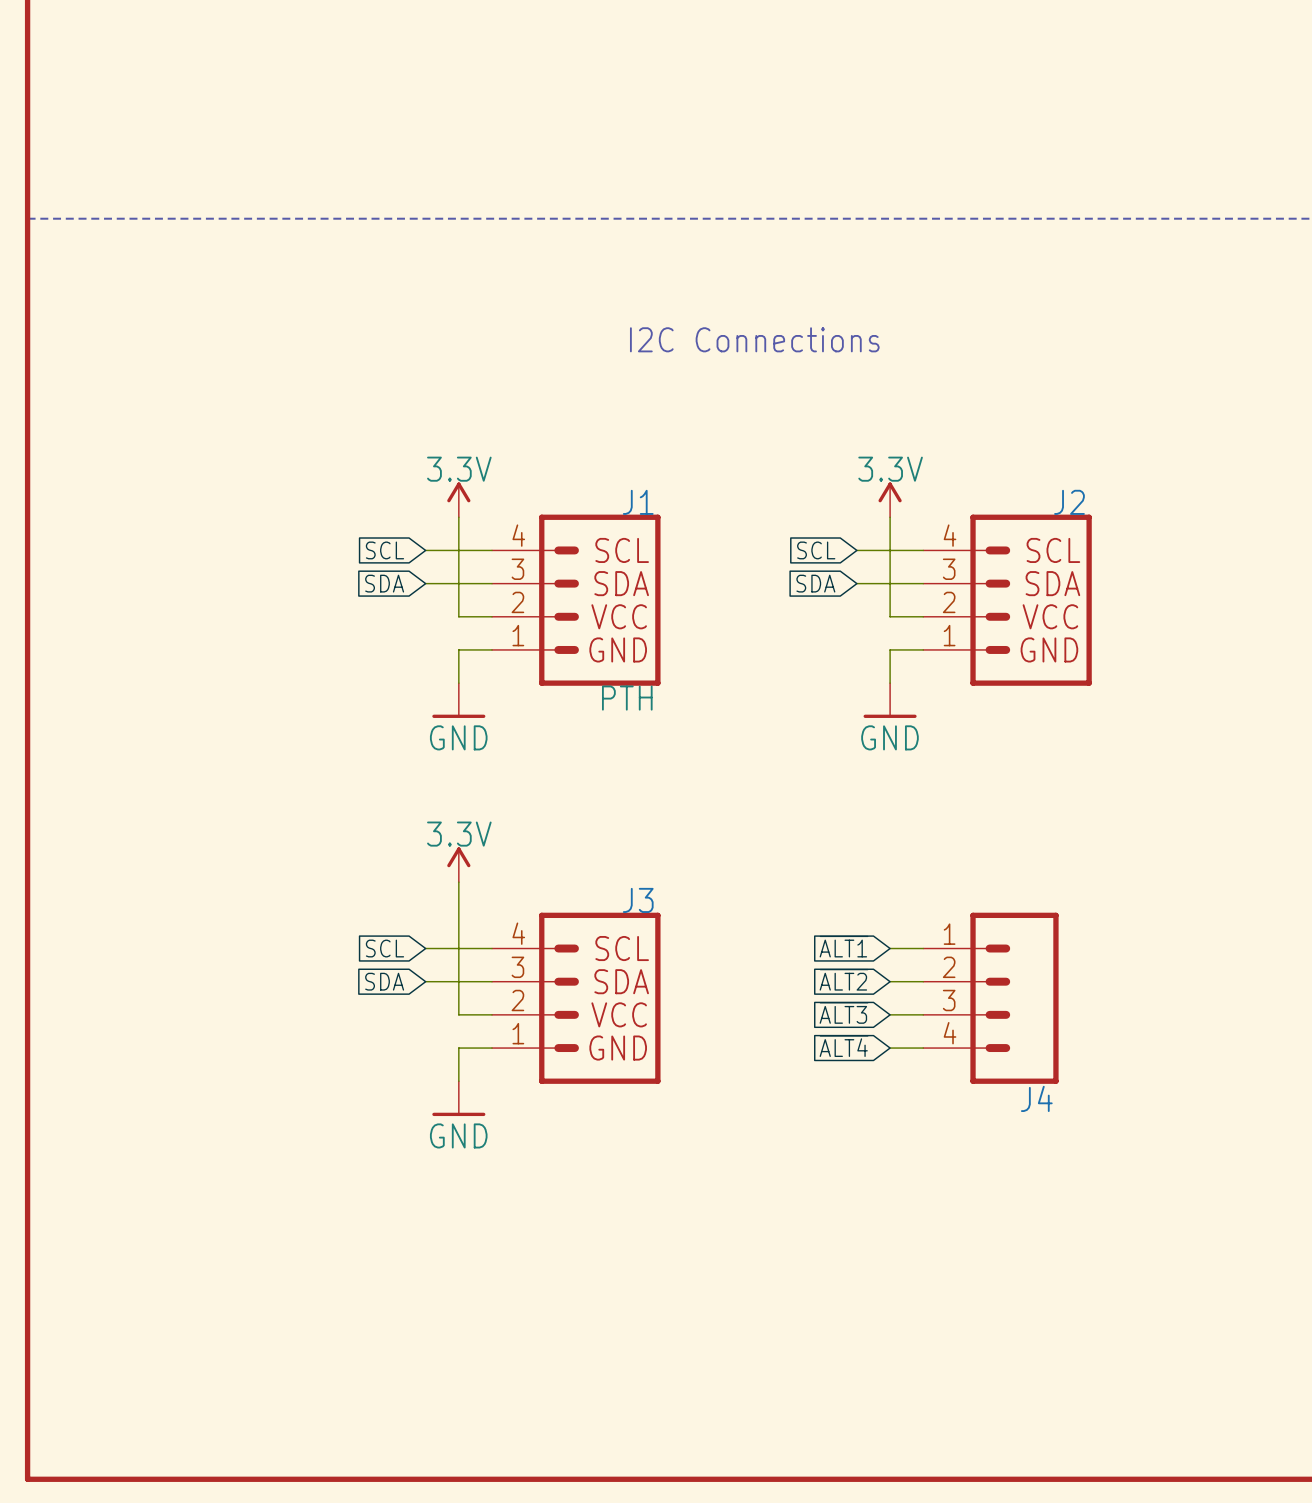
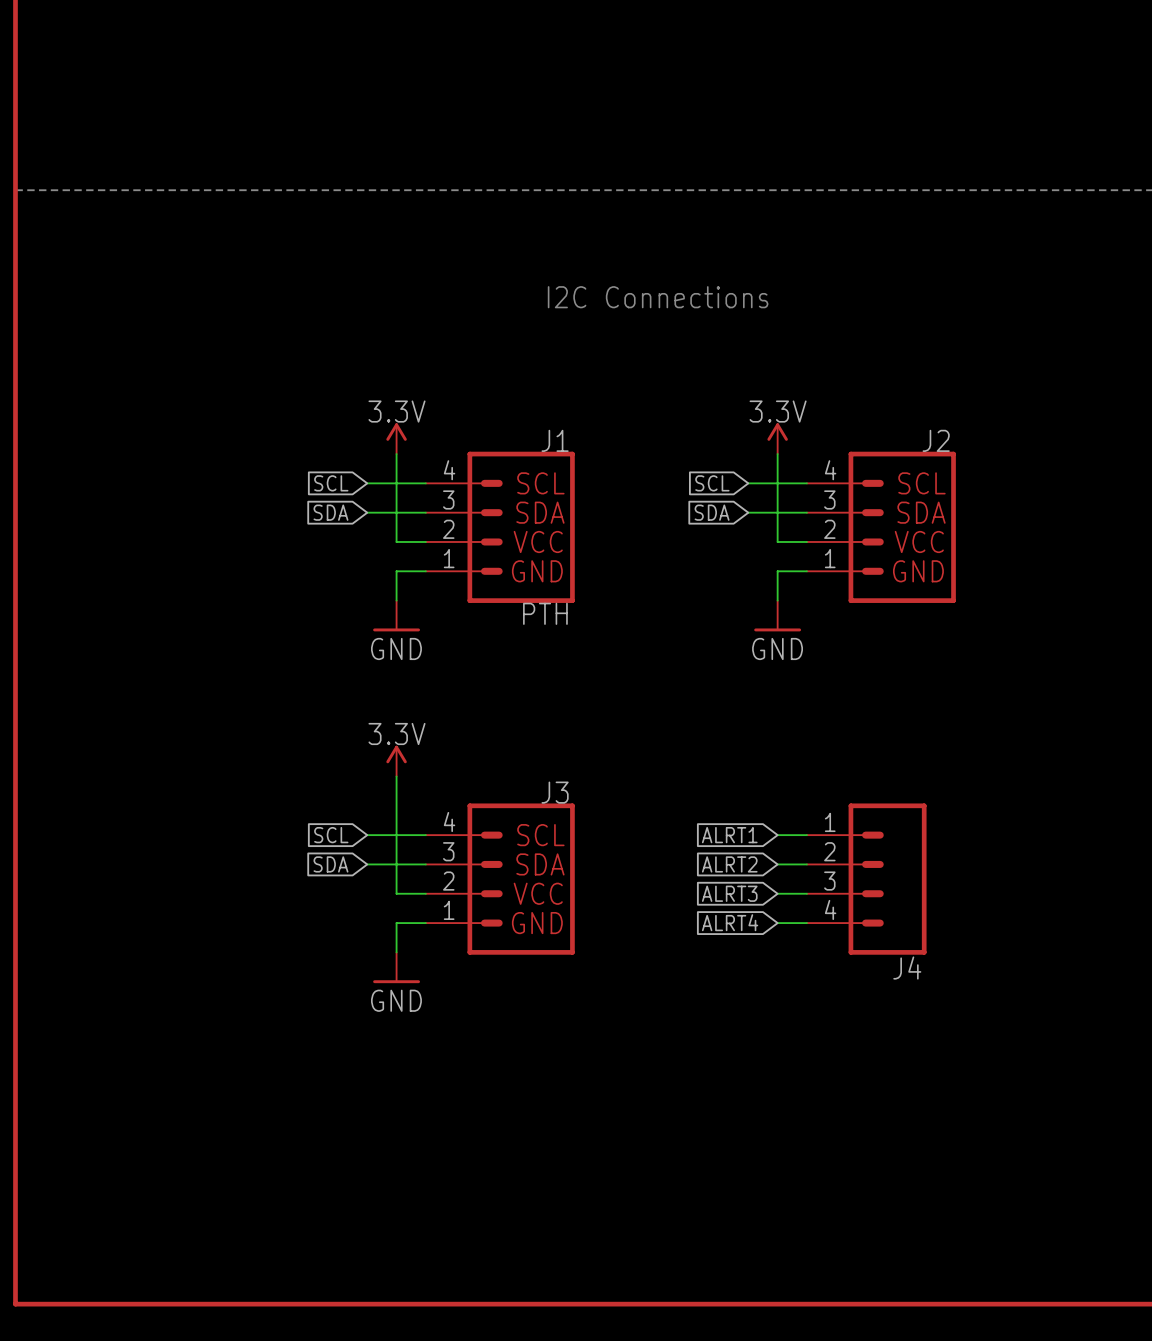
global label: ~{ALT1} (844, 946) -> ALRT1 (729, 835)
global label: ~{ALT2} (844, 979) -> ALRT2 (729, 864)
global label: ~{ALT3} (844, 1012) -> ALRT3 (729, 893)
global label: ~{ALT4} (844, 1046) -> ALRT4 (730, 922)

